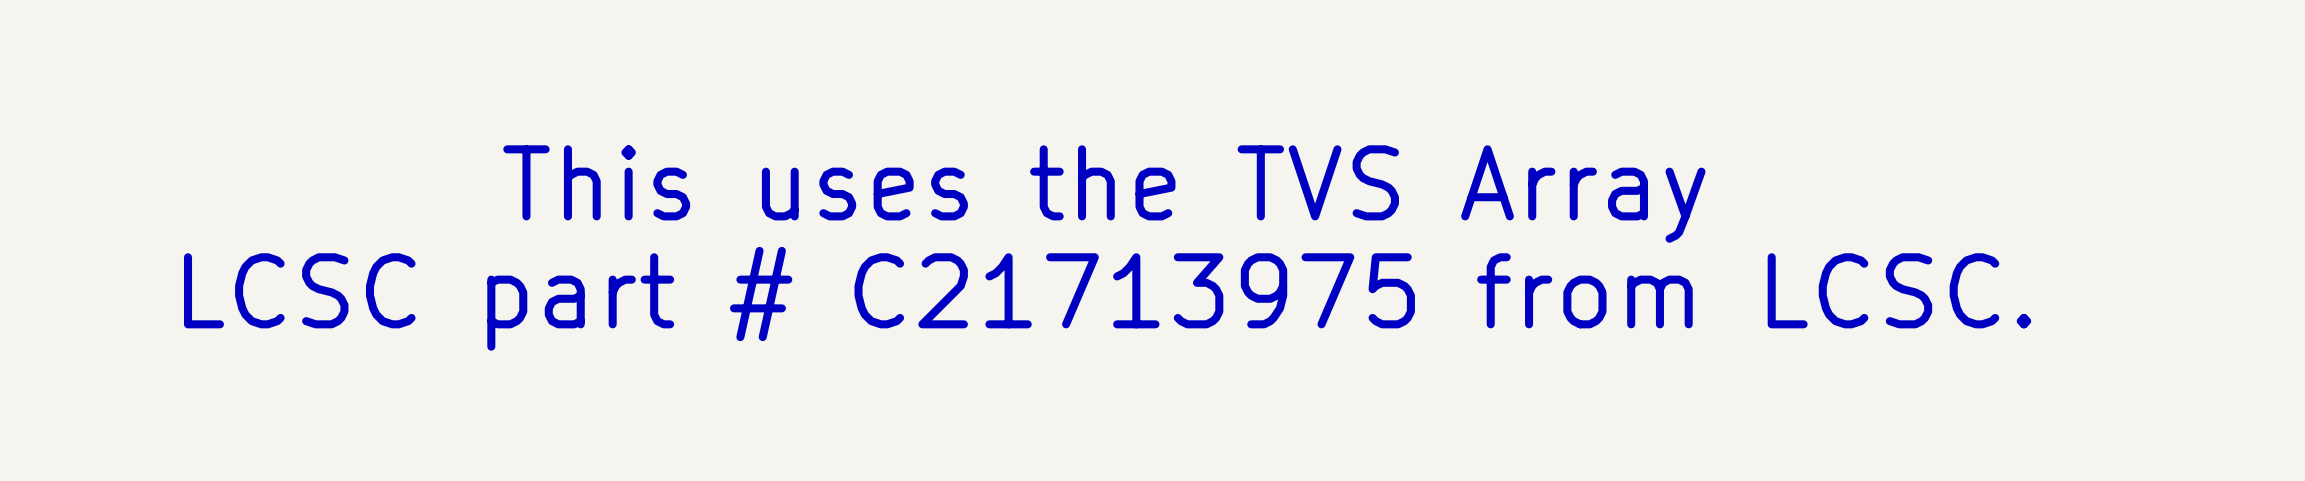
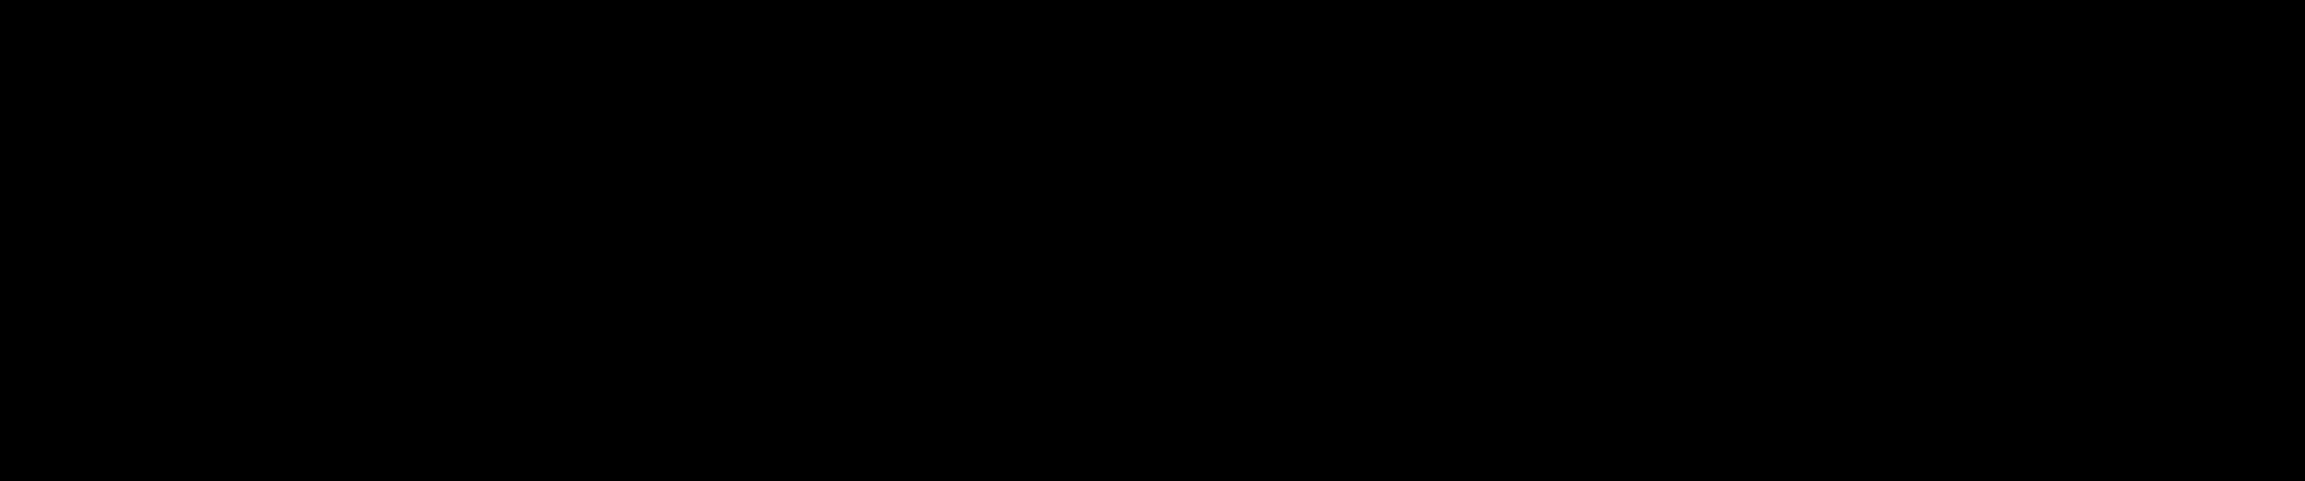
text: This uses the TVS Array (1104, 194) -> none
text: LCSC part # C21713975 from LCSC. (1107, 298) -> none

